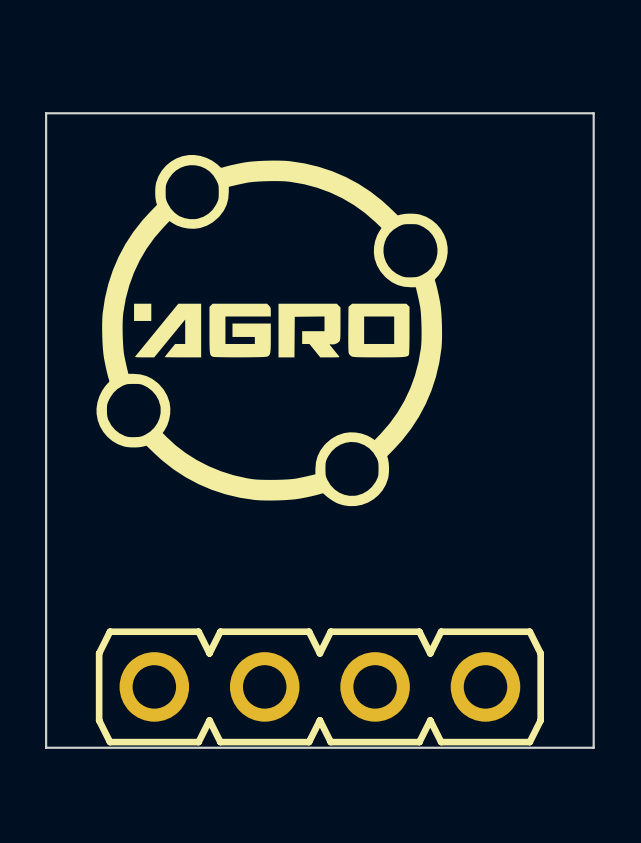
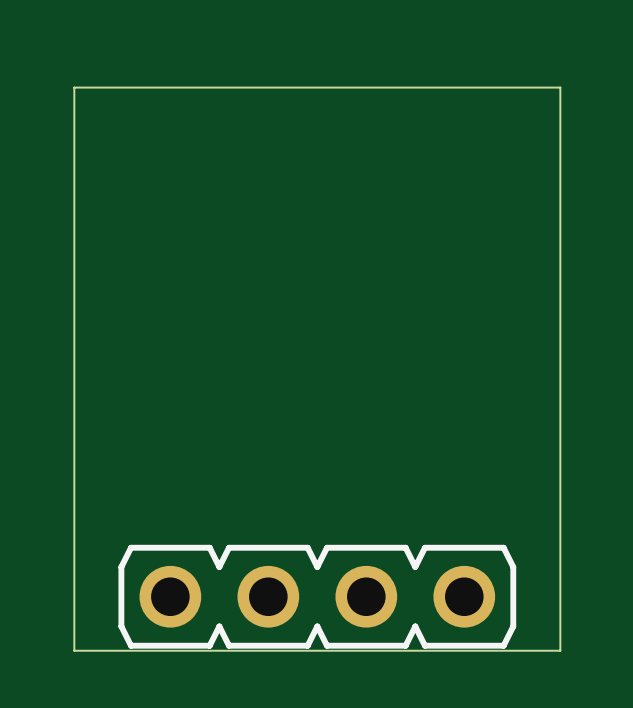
drawing: [96, 154, 448, 507] -> none

